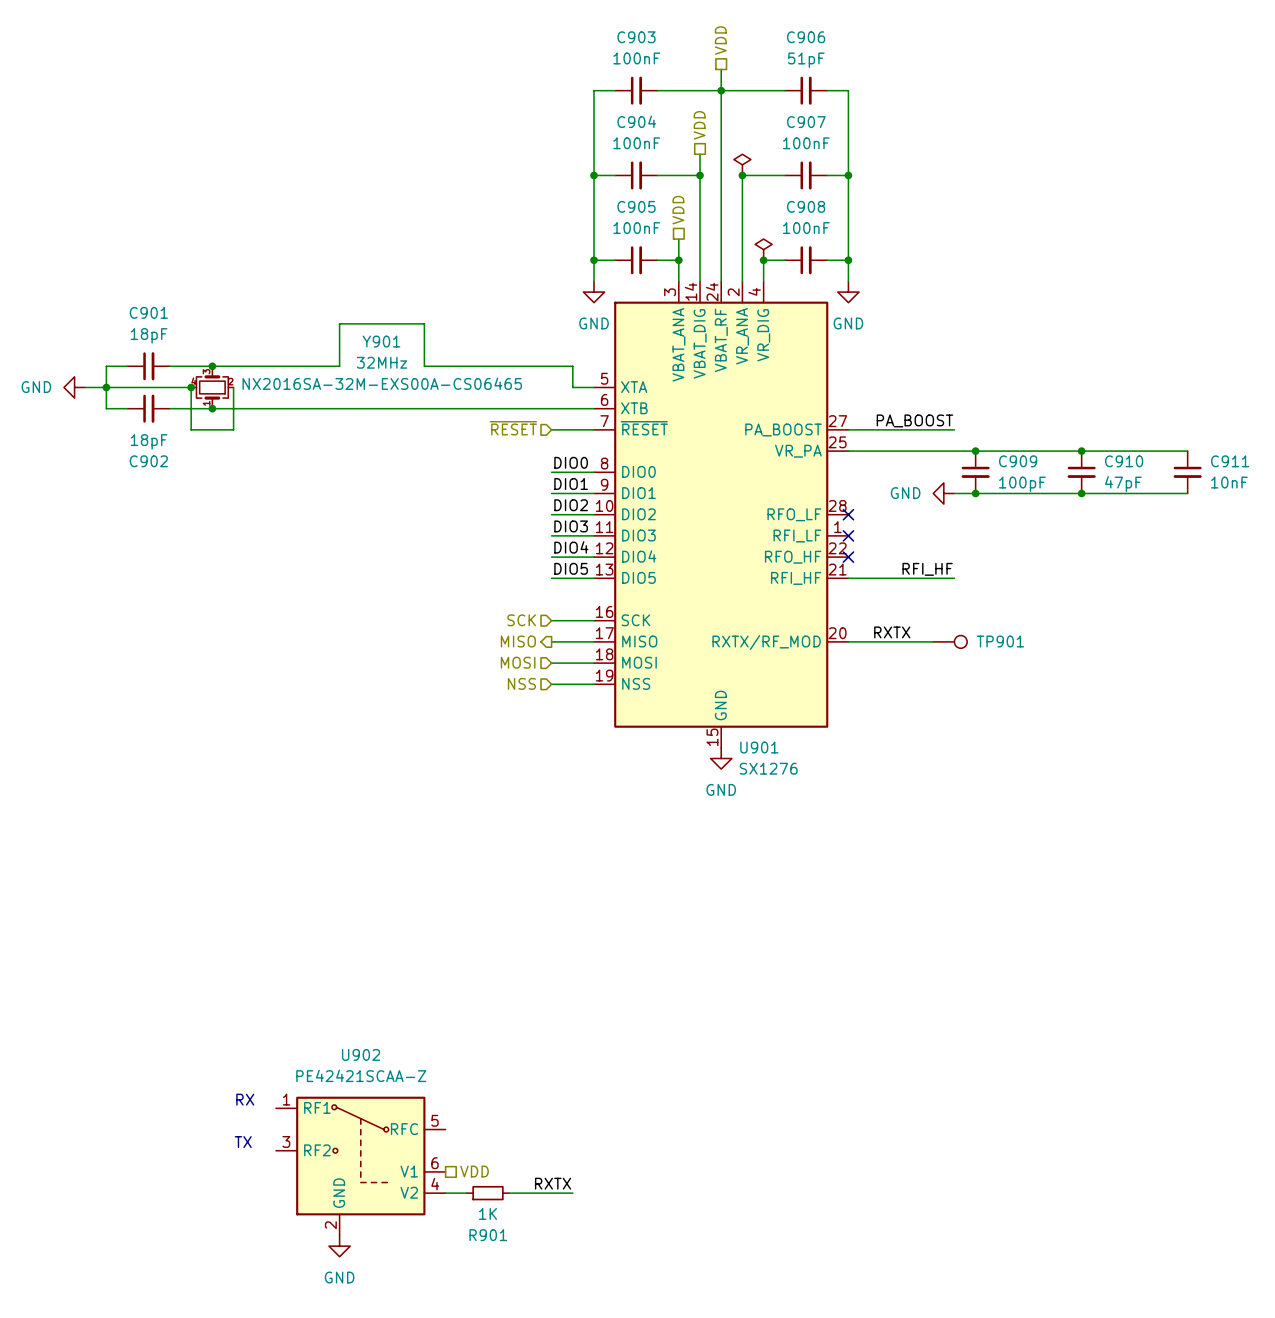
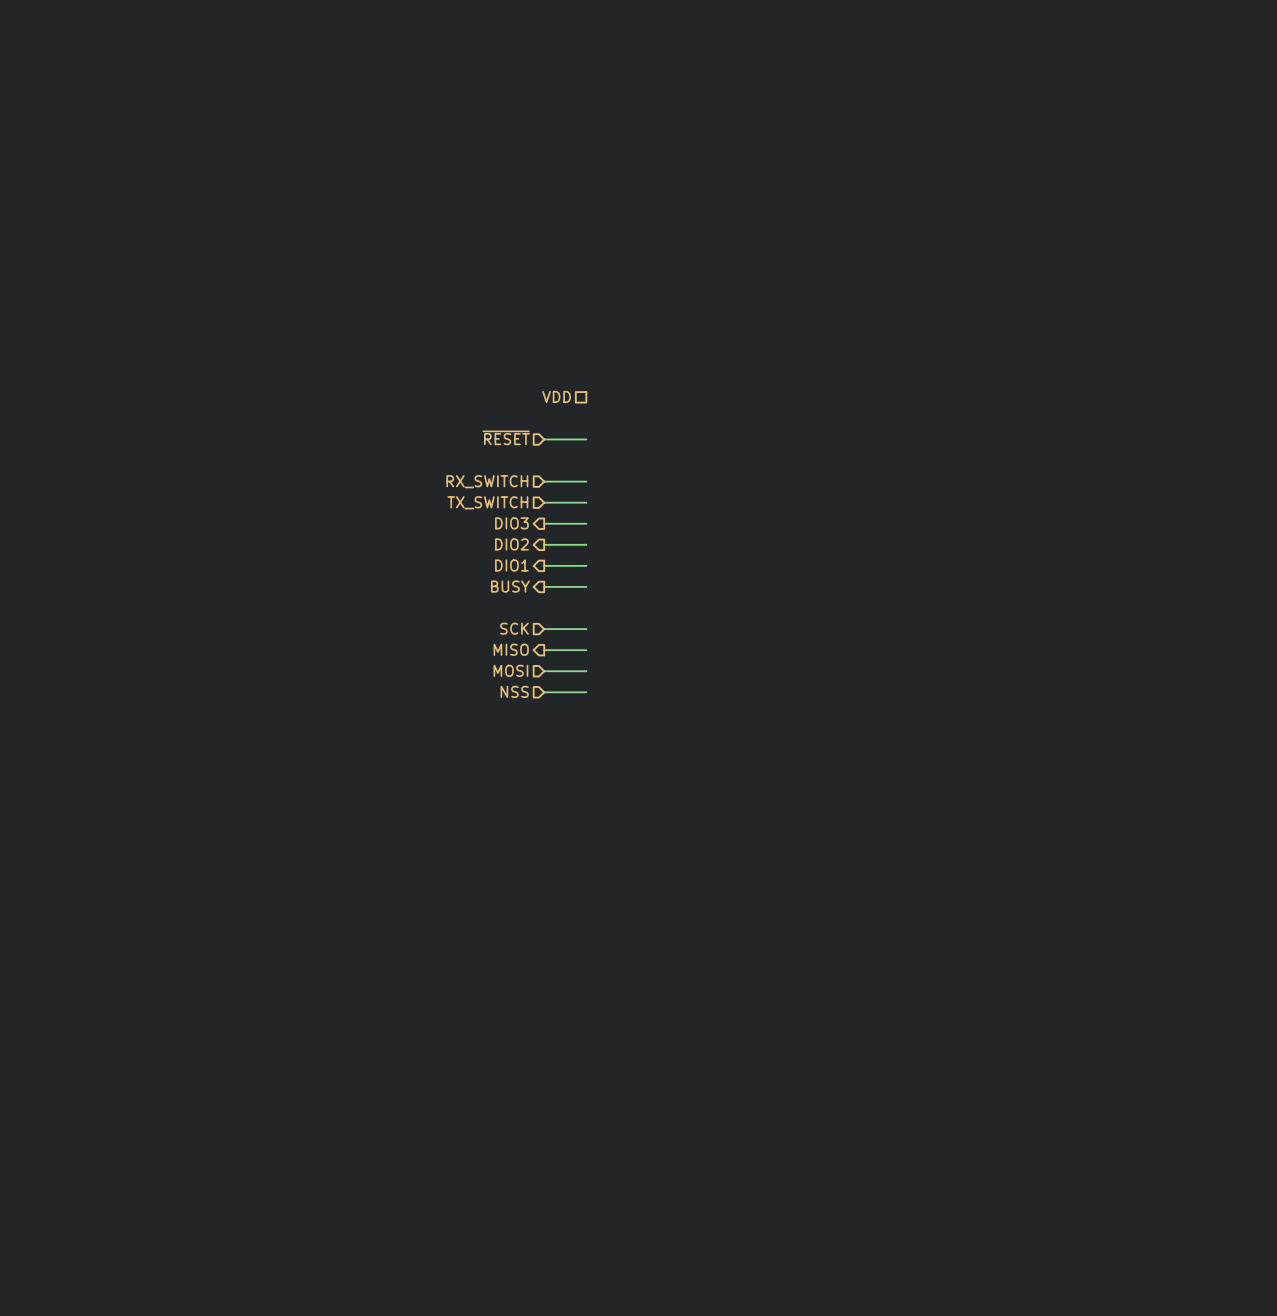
hierarchical label: VDD (720, 40) -> none
wire: (721, 69) (721, 281) -> none
wire: (615, 90) (594, 90) (594, 281) -> none
C903: 100nF (636, 90) -> none
wire: (657, 90) (784, 90) -> none
junction: (721, 90) -> none
C906: 51pF (806, 90) -> none
wire: (827, 90) (848, 90) (848, 281) -> none
hierarchical label: VDD (699, 125) -> none
wire: (700, 154) (700, 281) -> none
power symbol: (742, 164) -> none
wire: (594, 175) (615, 175) -> none
junction: (594, 175) -> none
C904: 100nF (636, 175) -> none
wire: (657, 175) (700, 175) -> none
junction: (700, 175) -> none
junction: (742, 175) -> none
wire: (784, 175) (742, 175) (742, 281) -> none
C907: 100nF (806, 175) -> none
wire: (827, 175) (848, 175) -> none
junction: (848, 175) -> none
hierarchical label: VDD (678, 210) -> none
wire: (678, 239) (678, 281) -> none
power symbol: (763, 249) -> none
wire: (594, 260) (615, 260) -> none
junction: (594, 260) -> none
C905: 100nF (636, 260) -> none
wire: (657, 260) (678, 260) -> none
junction: (678, 260) -> none
junction: (763, 260) -> none
wire: (784, 260) (763, 260) (763, 281) -> none
C908: 100nF (806, 260) -> none
wire: (827, 260) (848, 260) -> none
junction: (848, 260) -> none
power symbol: GND (594, 292) -> none
power symbol: GND (848, 292) -> none
wire: (127, 366) (106, 366) (106, 408) (127, 408) -> none
C901: 18pF (148, 366) -> none
wire: (169, 366) (339, 366) (339, 323) (424, 323) (424, 366) (572, 366) (572, 387) (594, 387) -> none
junction: (212, 366) -> none
power symbol: GND (74, 387) -> none
wire: (85, 387) (191, 387) (191, 429) (233, 429) (233, 387) -> none
junction: (106, 387) -> none
junction: (191, 387) -> none
Y901: 32MHz (212, 387) -> none
hierarchical label: none -> VDD (556, 396)
C902: 18pF (148, 408) -> none
wire: (169, 408) (594, 408) -> none
junction: (212, 408) -> none
label: PA_BOOST (914, 420) -> none
wire: (848, 429) (954, 429) -> none
wire: (848, 451) (1187, 451) -> none
junction: (975, 451) -> none
junction: (1081, 451) -> none
label: DIO0 (571, 462) -> none
hierarchical label: none -> RX_SWITCH (487, 481)
C909: 100pF (975, 472) -> none
C910: 47pF (1081, 472) -> none
C911: 10nF (1187, 472) -> none
label: DIO1 (571, 484) -> none
hierarchical label: none -> TX_SWITCH (487, 502)
power symbol: GND (943, 493) -> none
wire: (954, 493) (1187, 493) -> none
junction: (975, 493) -> none
junction: (1081, 493) -> none
label: DIO2 (571, 505) -> none
hierarchical label: none -> DIO3 (511, 523)
U901: SX1276 (721, 514) -> none
no-connect mark: (848, 514) -> none
label: DIO3 (571, 526) -> none
hierarchical label: none -> DIO2 (511, 544)
no-connect mark: (848, 535) -> none
label: DIO4 (571, 547) -> none
hierarchical label: none -> DIO1 (511, 565)
no-connect mark: (848, 557) -> none
label: DIO5 (571, 568) -> none
label: RFI_HF (927, 569) -> none
hierarchical label: none -> BUSY (510, 586)
wire: (848, 578) (954, 578) -> none
label: RXTX (892, 632) -> none
wire: (848, 641) (933, 641) -> none
TP901: (950, 641) -> none
power symbol: GND (721, 758) -> none
text: RX (245, 1099) -> none
text: TX (243, 1142) -> none
U902: PE42421SCAA-Z (360, 1166) -> none
hierarchical label: VDD (474, 1171) -> none
label: RXTX (553, 1183) -> none
wire: (445, 1193) (466, 1193) -> none
R901: 1K (488, 1193) -> none
wire: (509, 1193) (572, 1193) -> none
power symbol: GND (339, 1246) -> none

